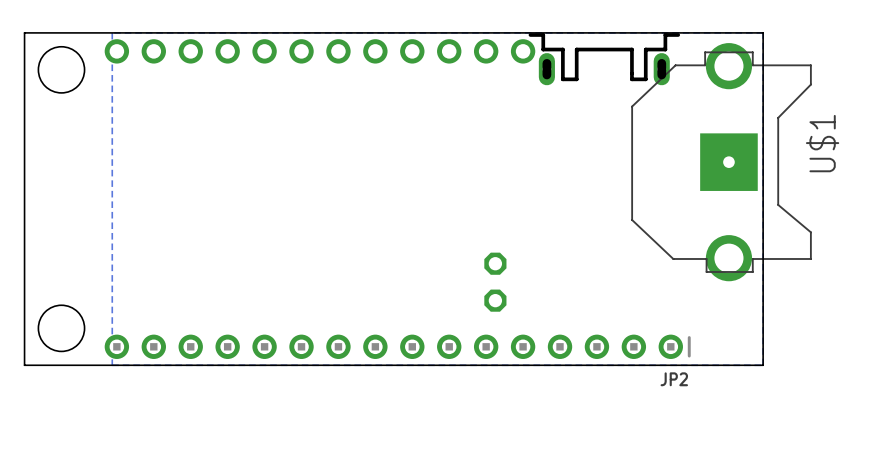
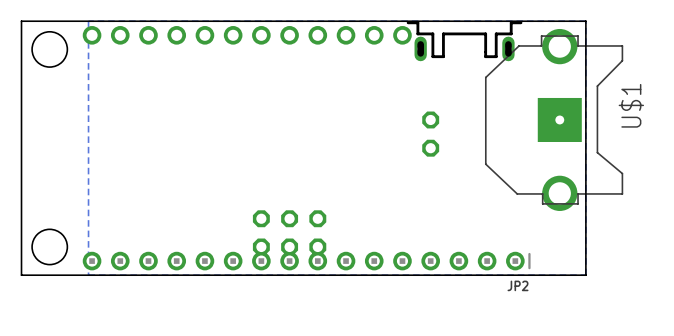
part: none -> (430, 134)
part: (495, 282) -> none
part: none -> (261, 232)
part: none -> (289, 232)
part: none -> (317, 232)

